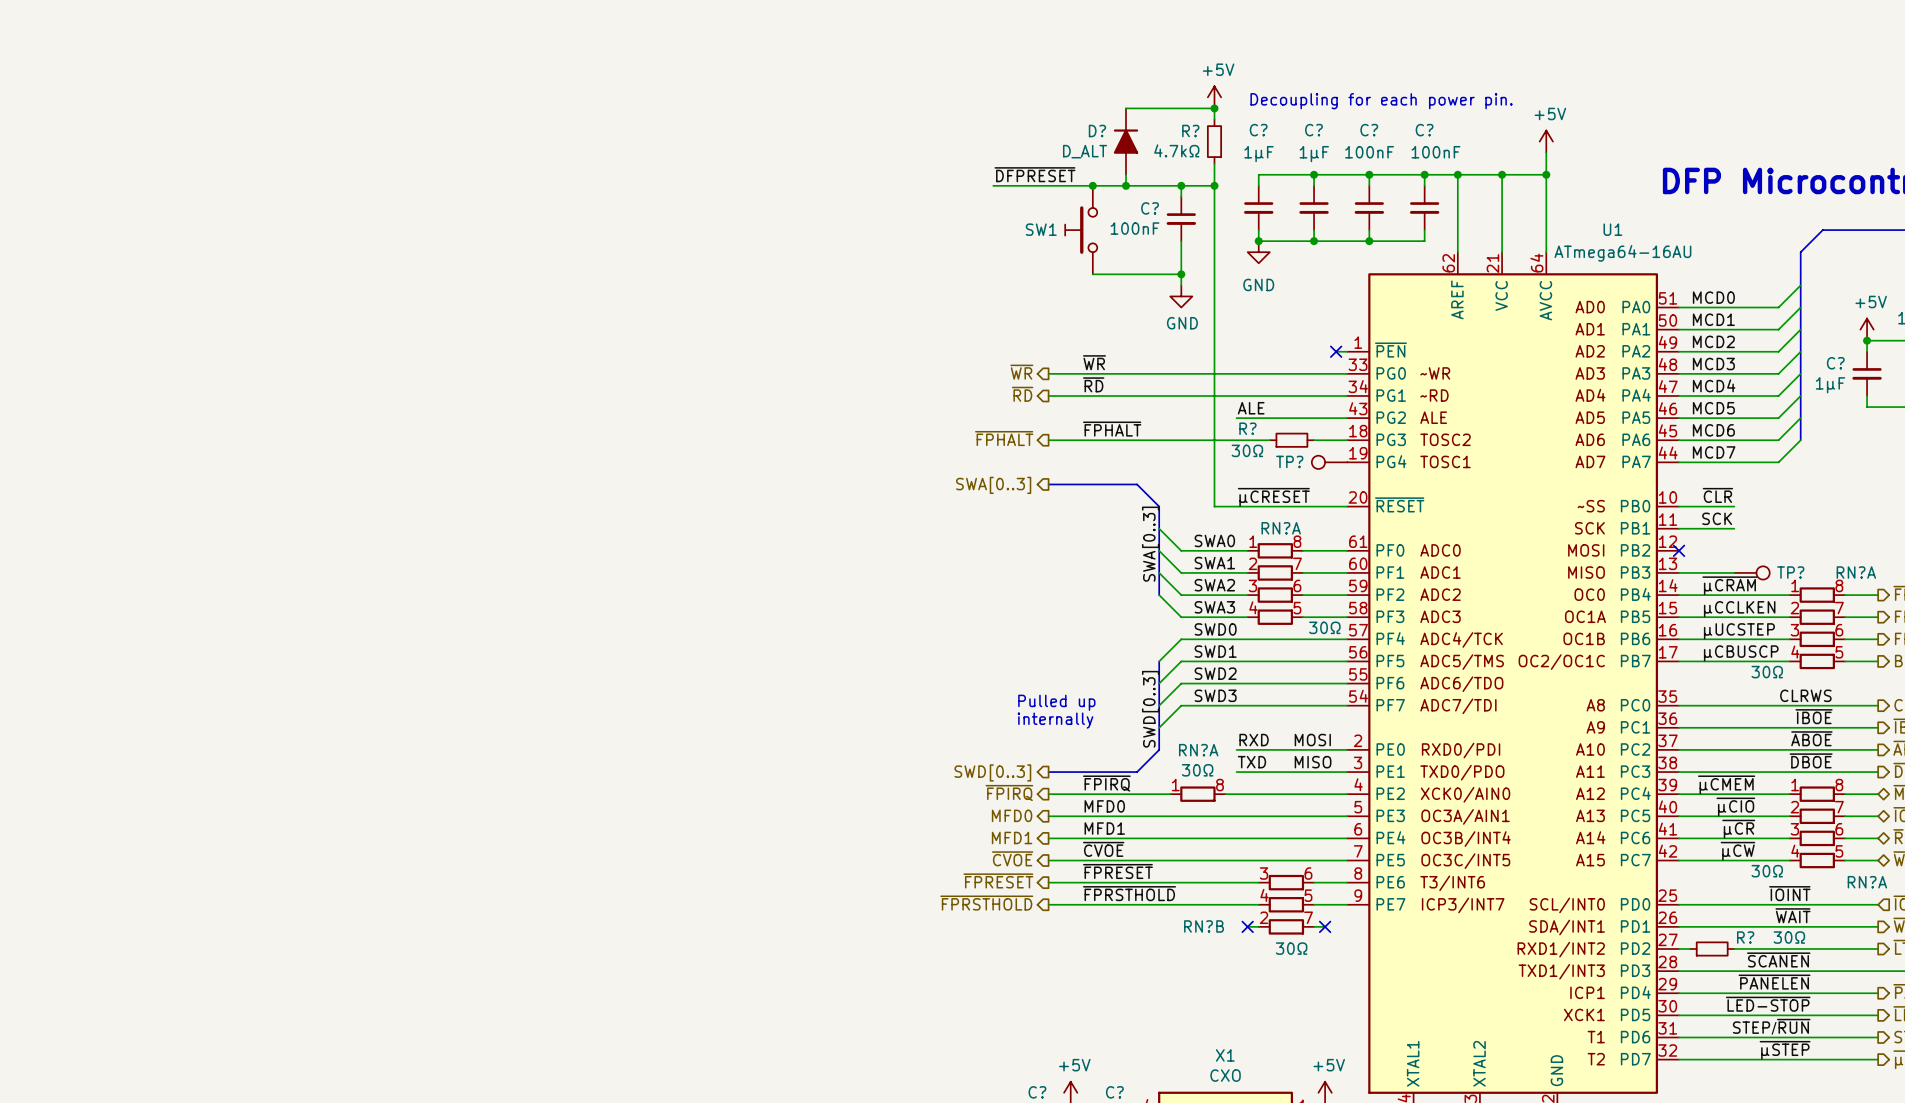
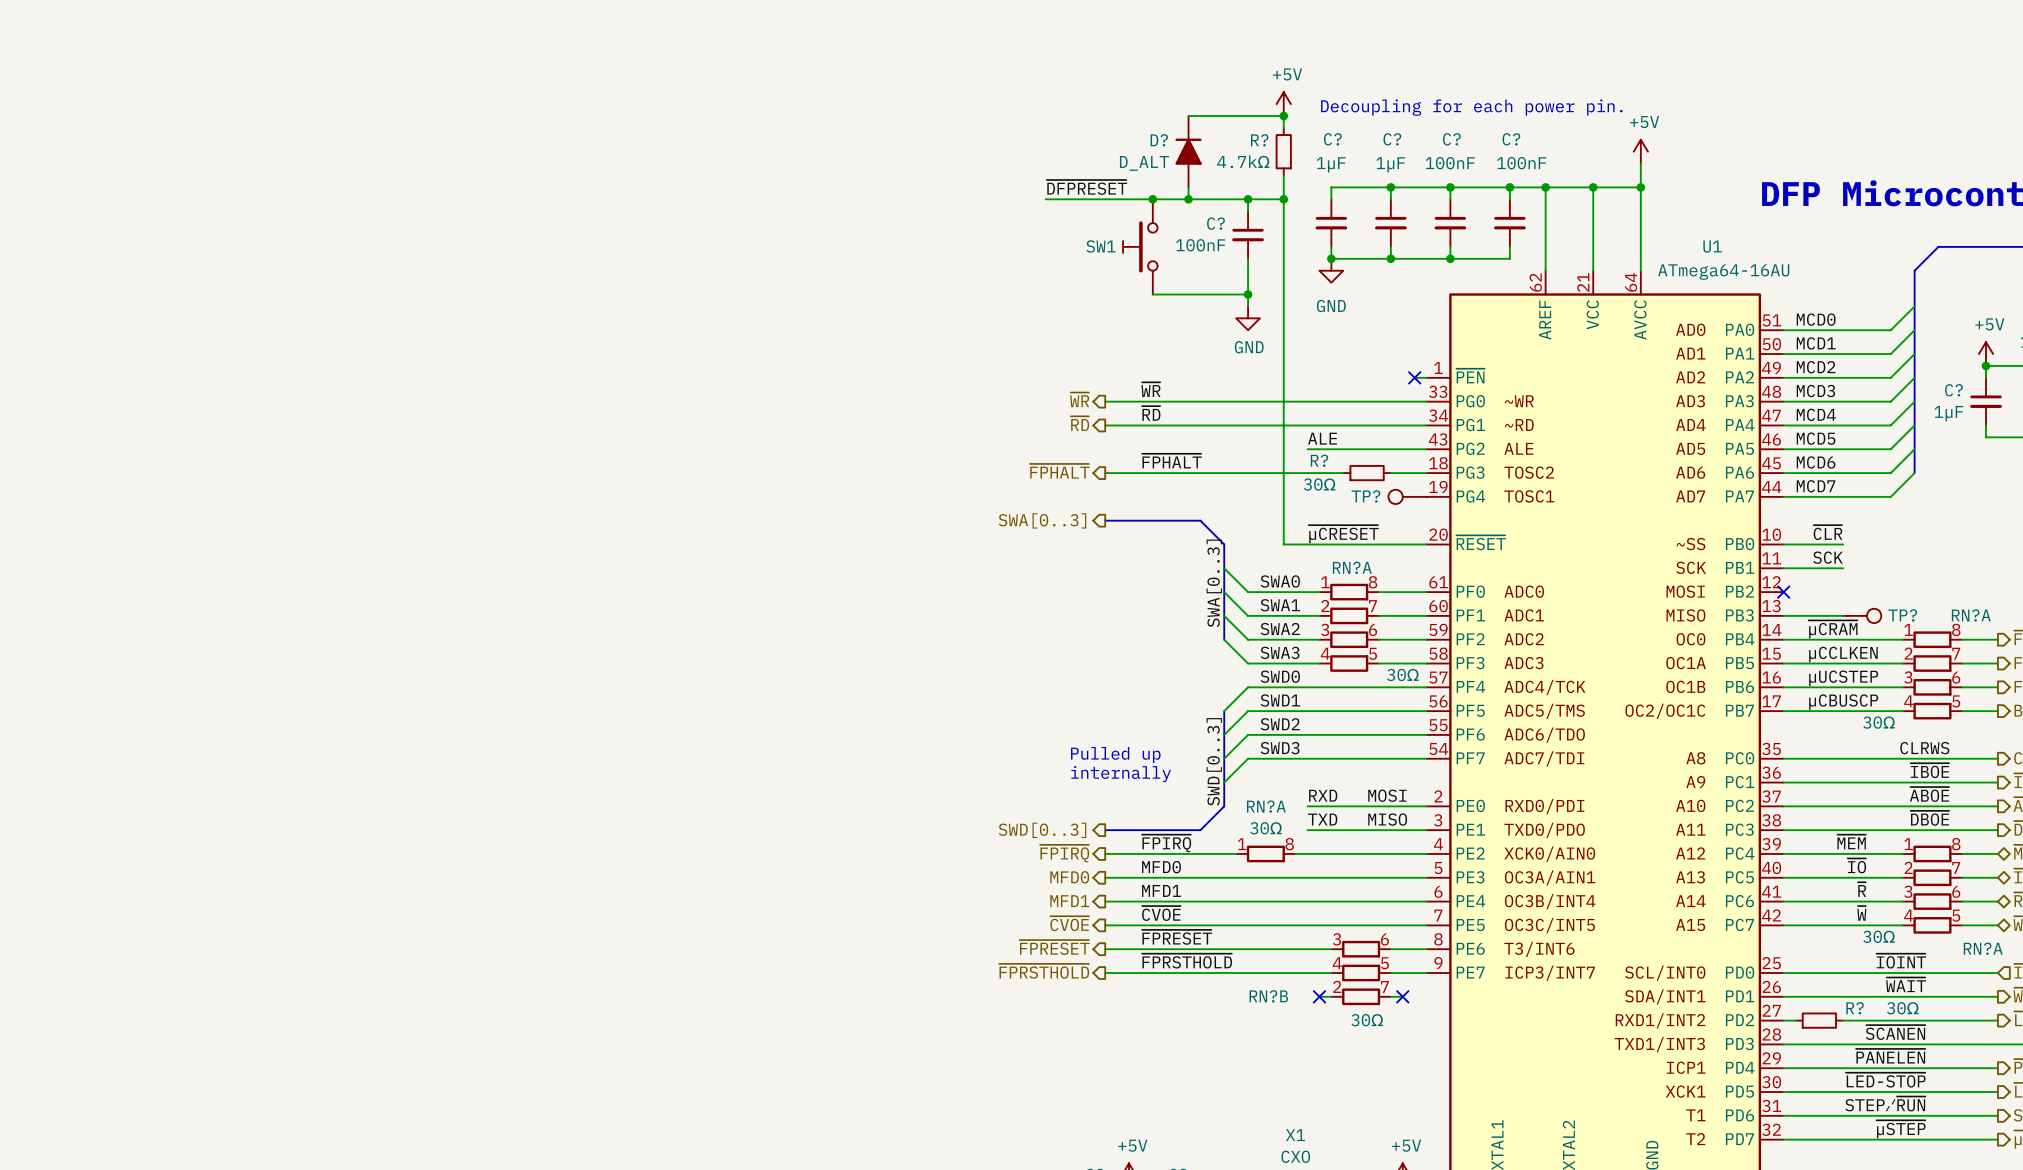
label: ~{µCMEM} (1726, 784) -> ~{MEM} (1851, 841)
label: ~{µCIO} (1735, 806) -> ~{IO} (1856, 865)
label: ~{µCR} (1738, 829) -> ~{R} (1862, 889)
label: ~{µCW} (1737, 851) -> ~{W} (1861, 913)

